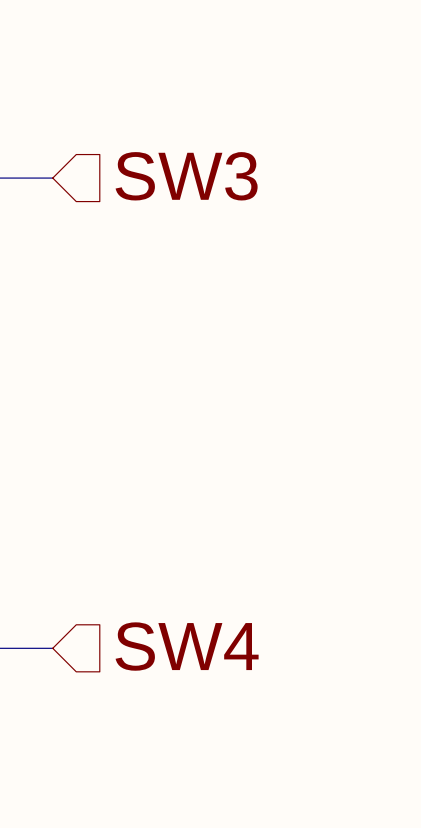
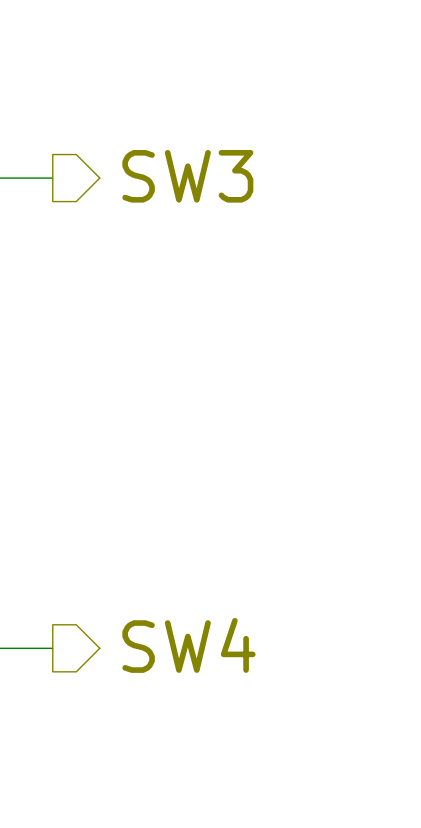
hierarchical label shape: input (186, 176) -> output (187, 176)
hierarchical label shape: input (187, 646) -> output (188, 645)

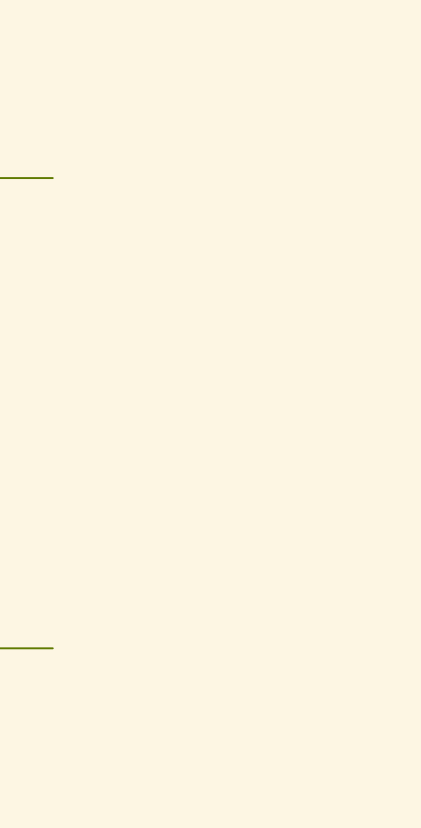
hierarchical label: SW3 (187, 176) -> none
hierarchical label: SW4 (188, 645) -> none

